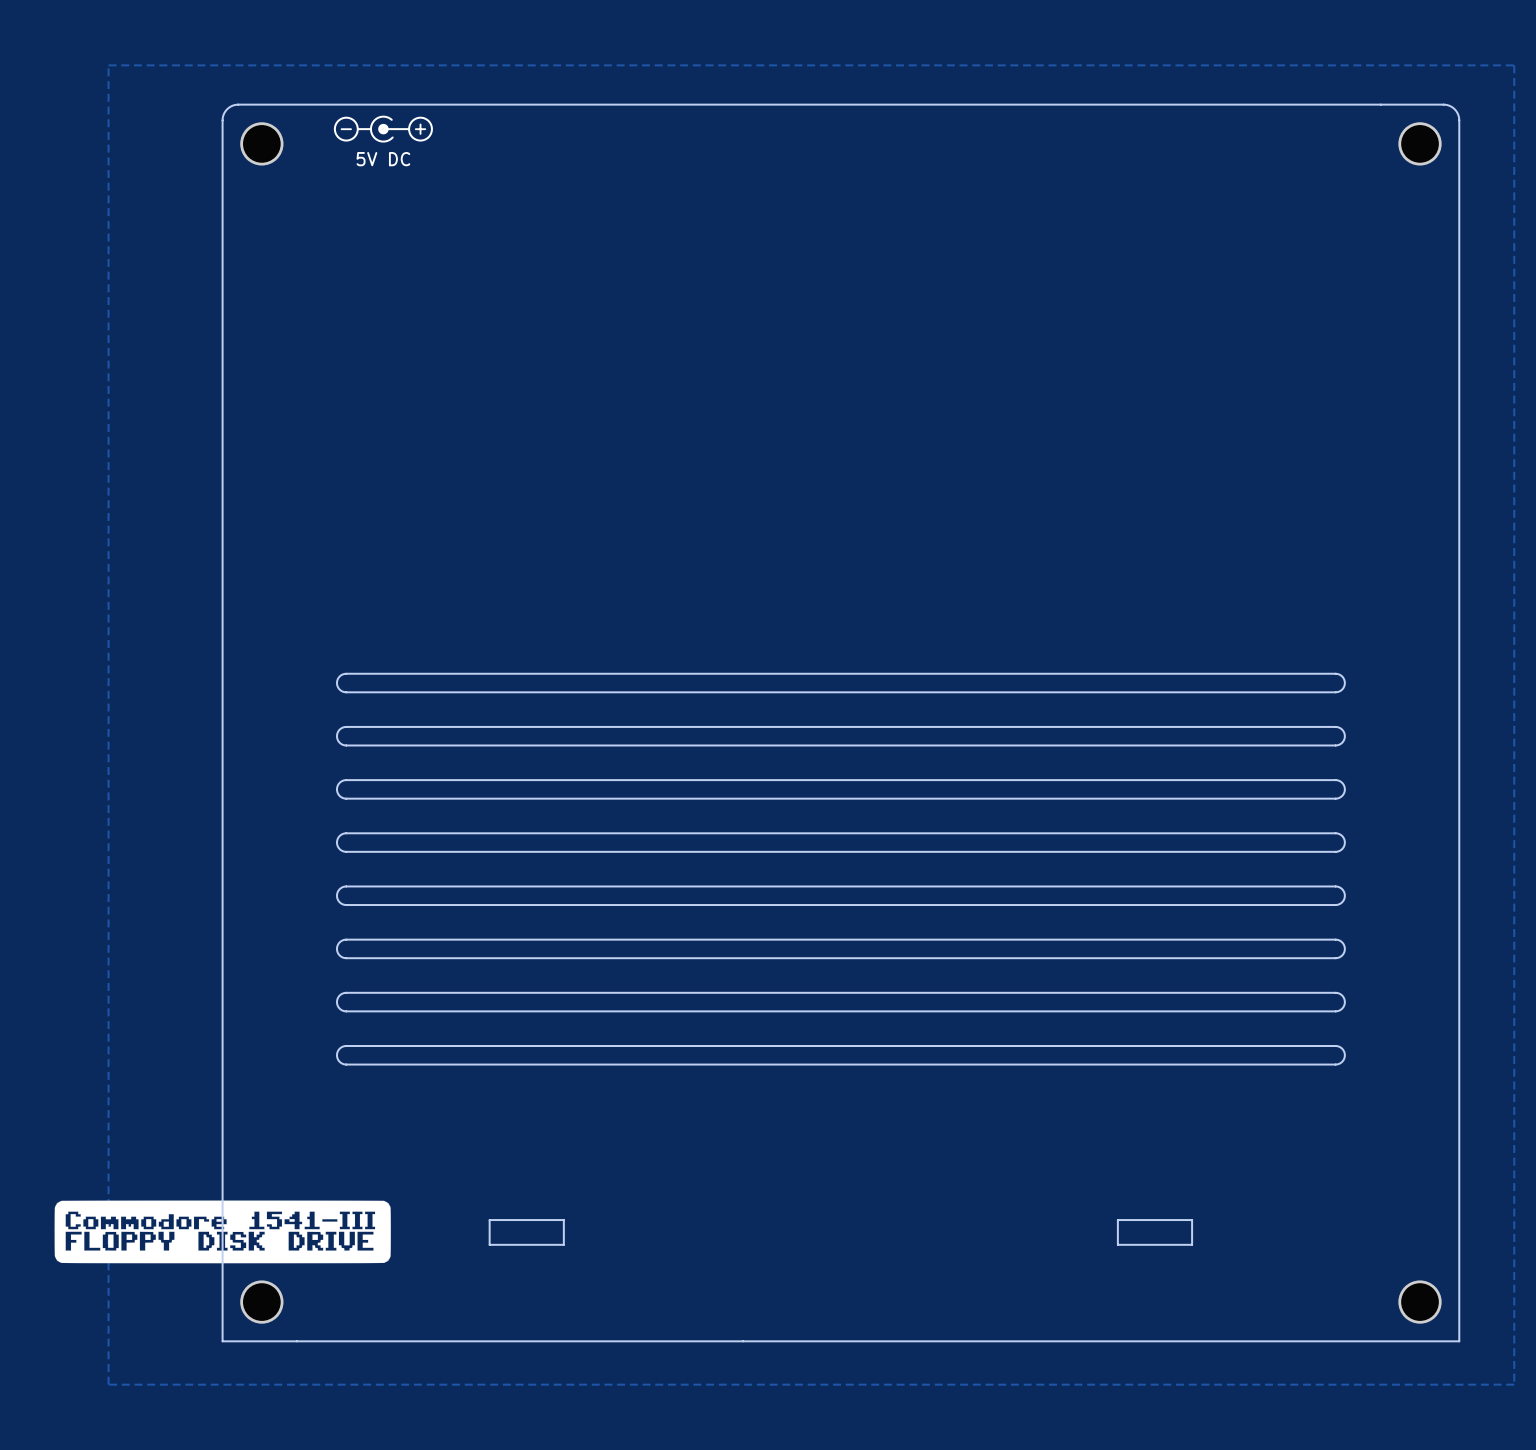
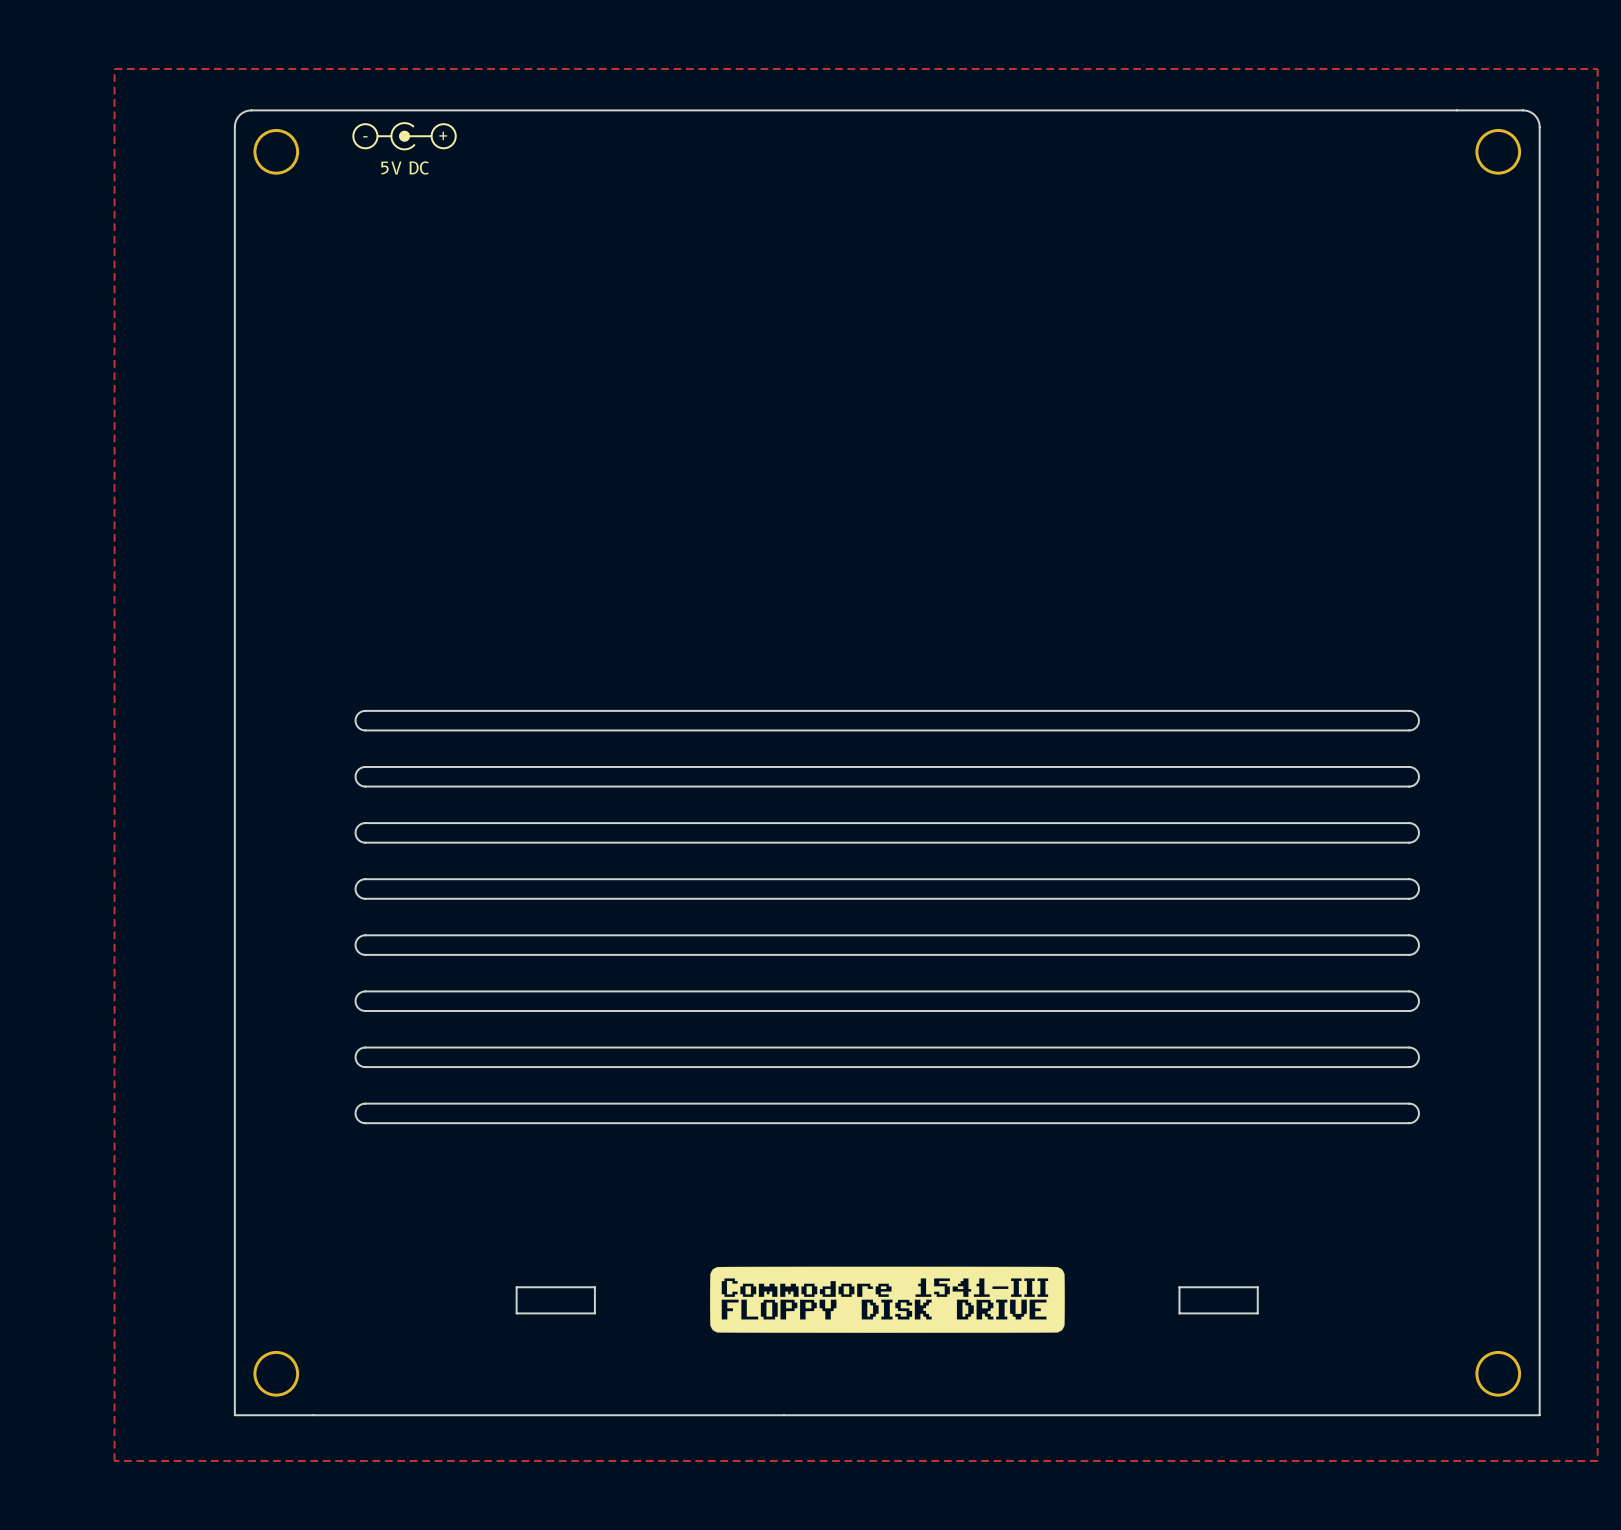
drawing: [54, 1200, 391, 1264] -> none
drawing: none -> [710, 1266, 1065, 1333]

